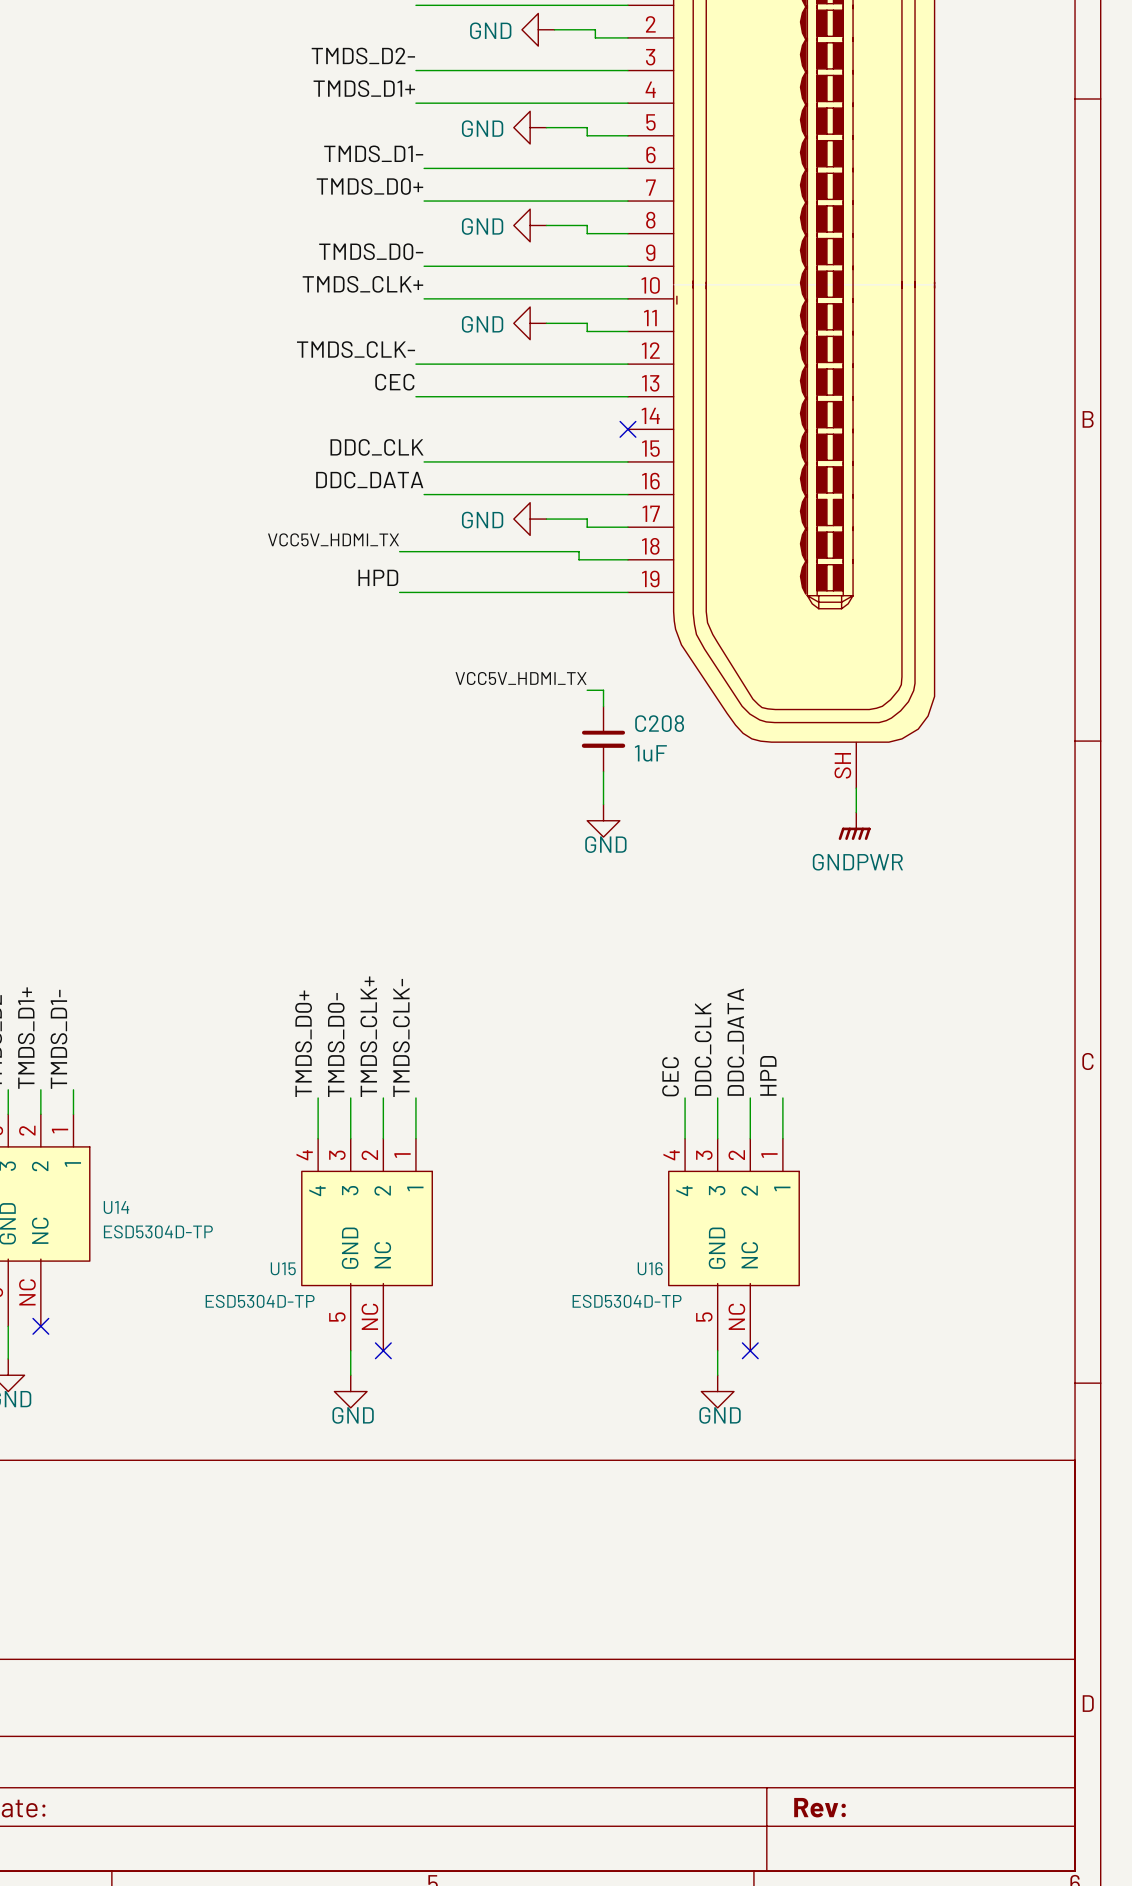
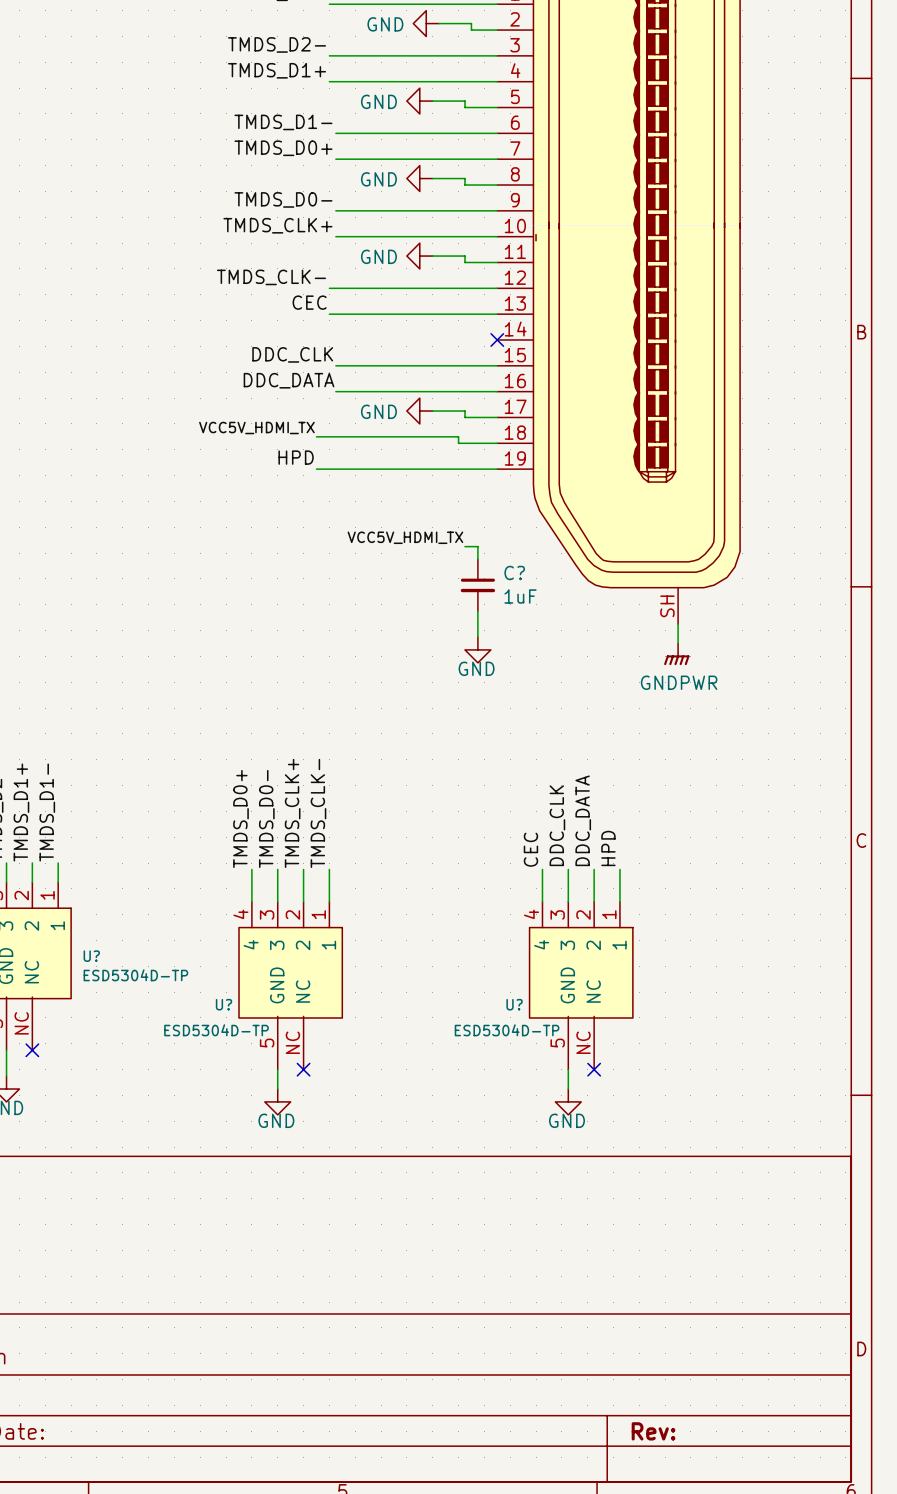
C208 name: C208 (659, 723) -> C? (514, 572)
U14 name: U14 (116, 1207) -> U? (91, 956)
U15 name: U15 (283, 1268) -> U? (224, 1004)
U16 name: U16 (650, 1268) -> U? (514, 1004)

